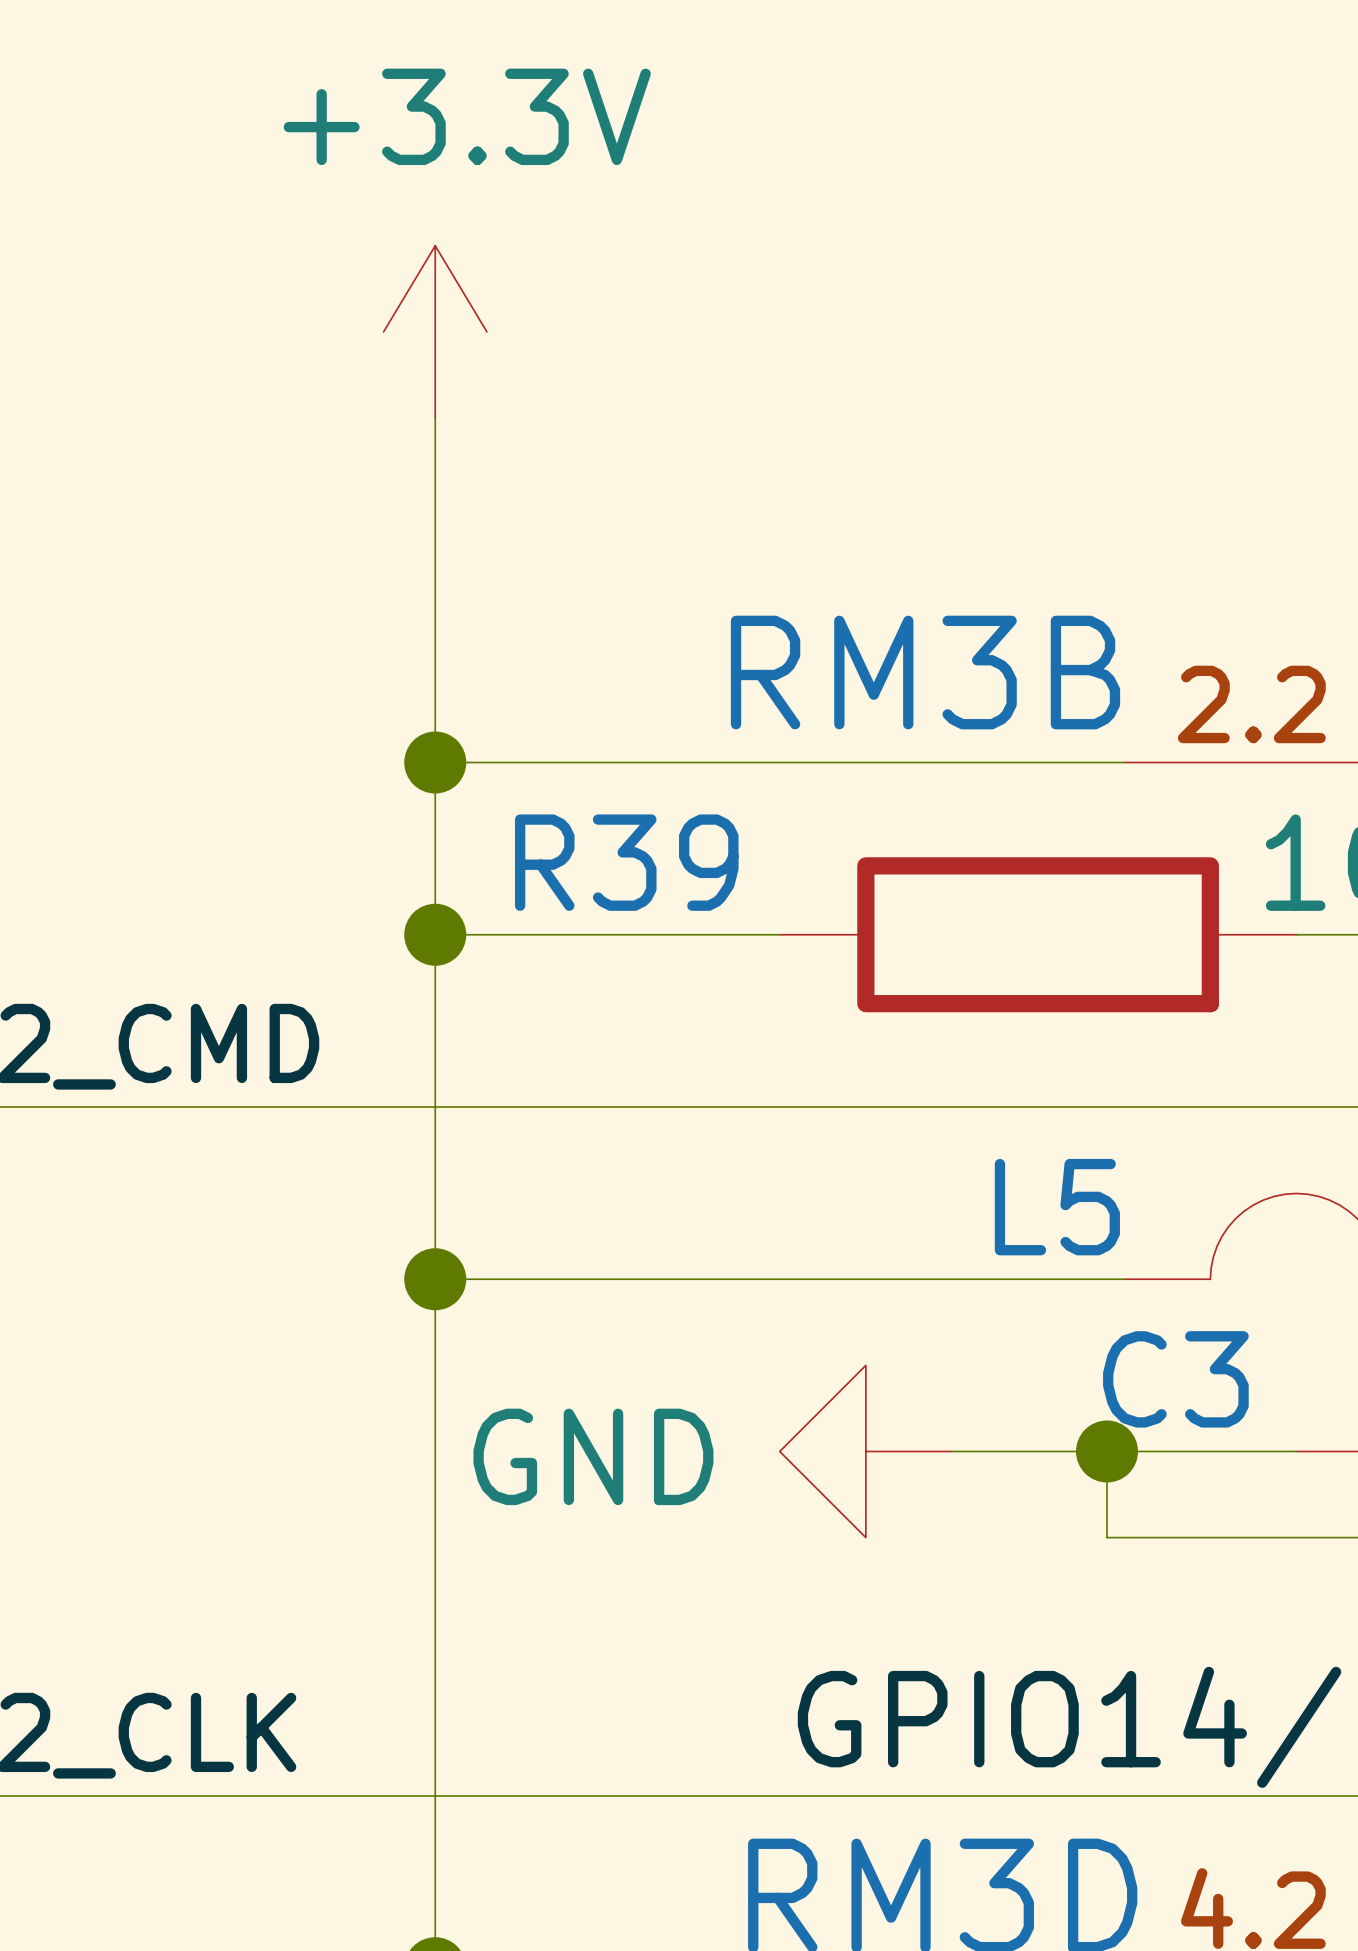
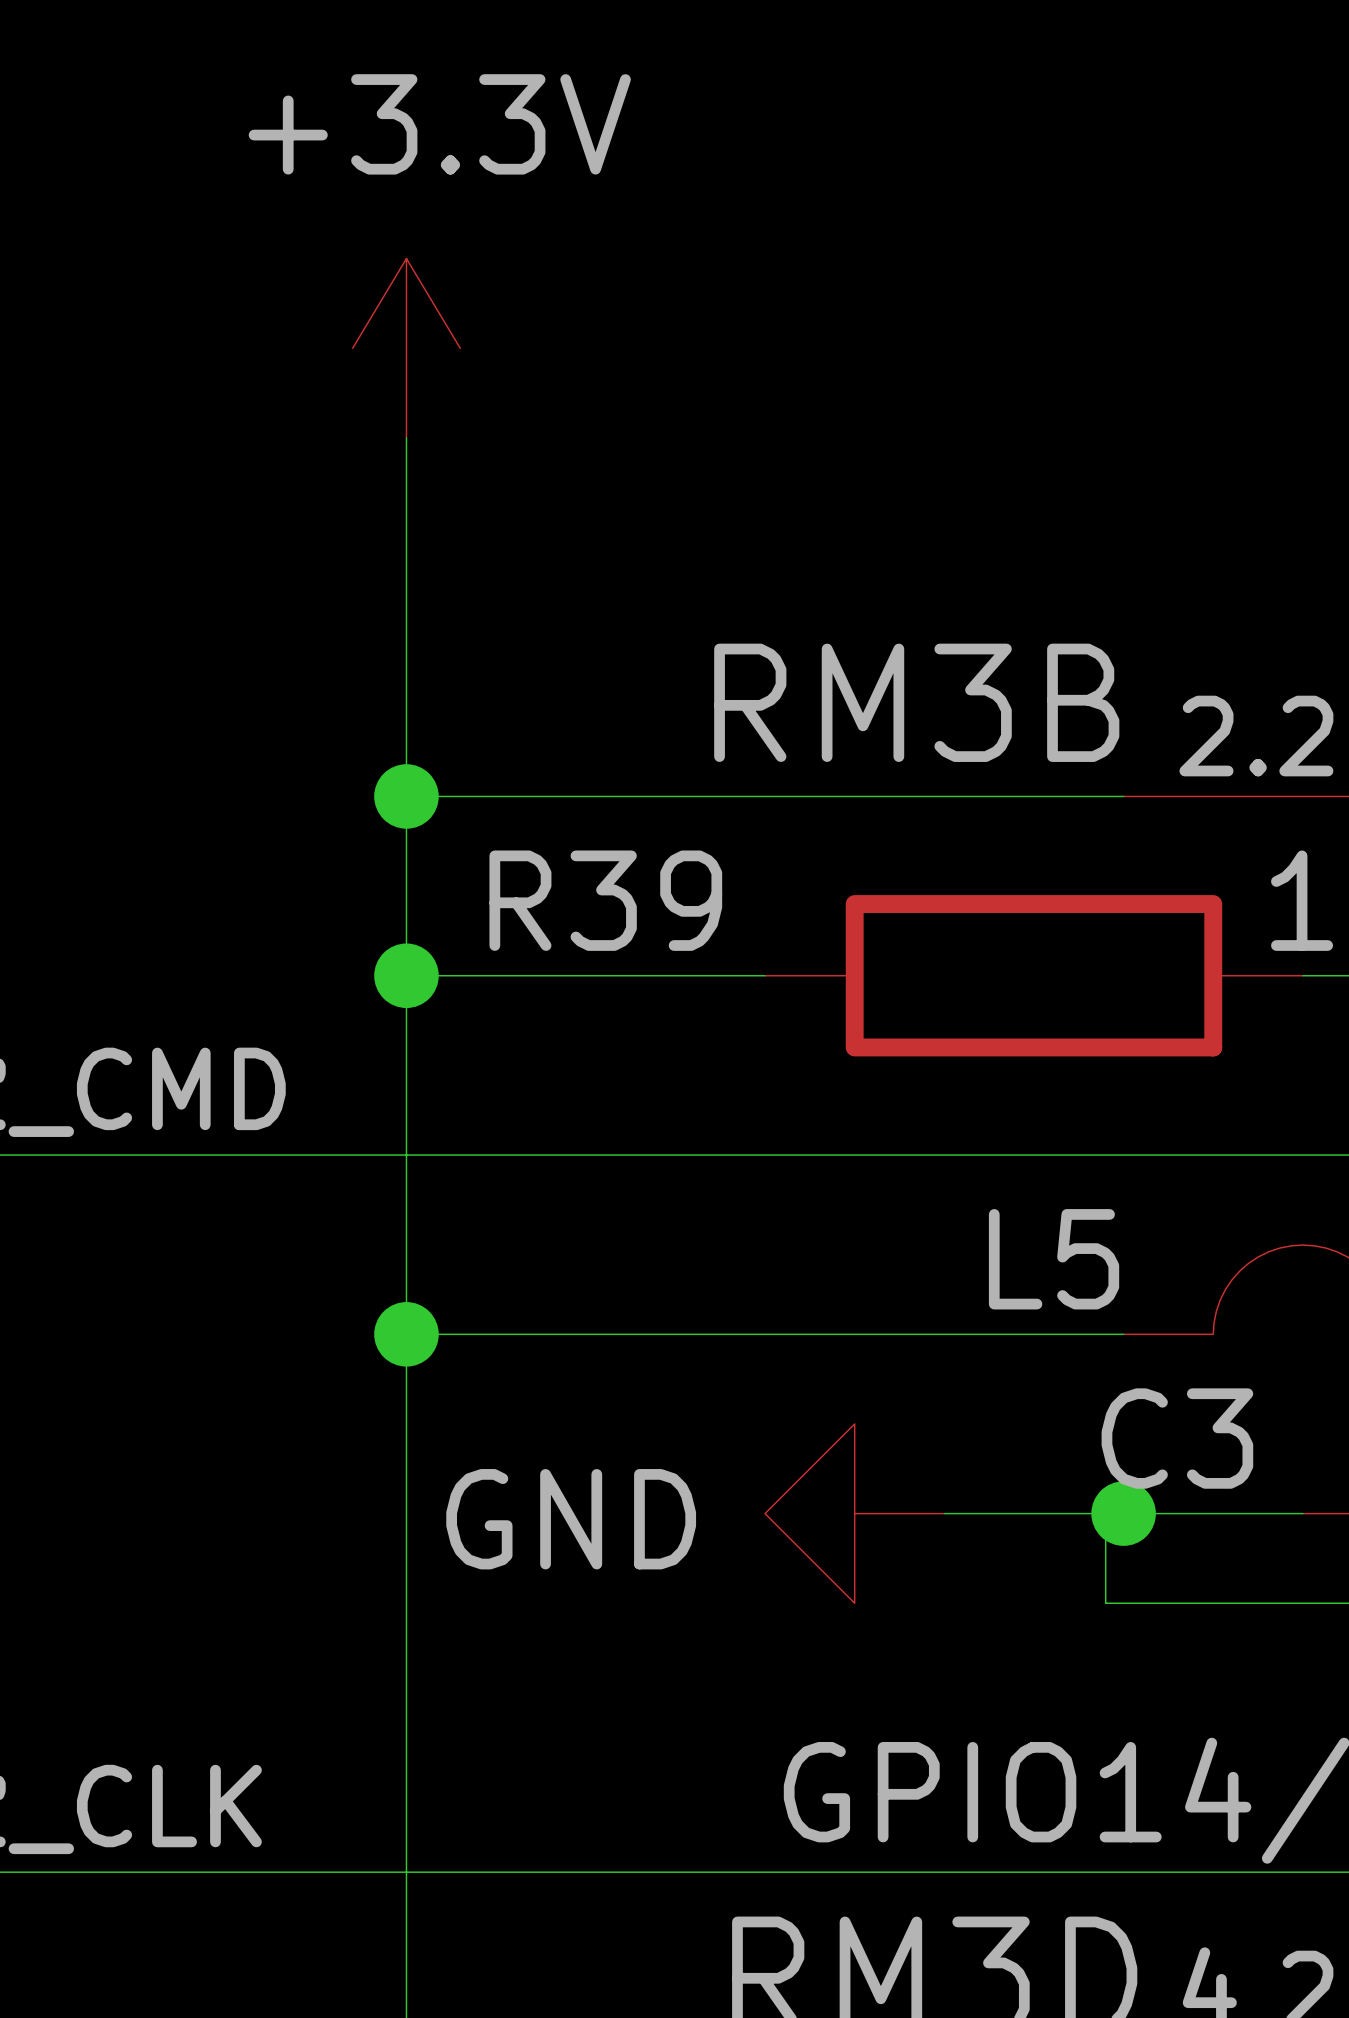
junction position: (1106, 1451) -> (1123, 1513)

